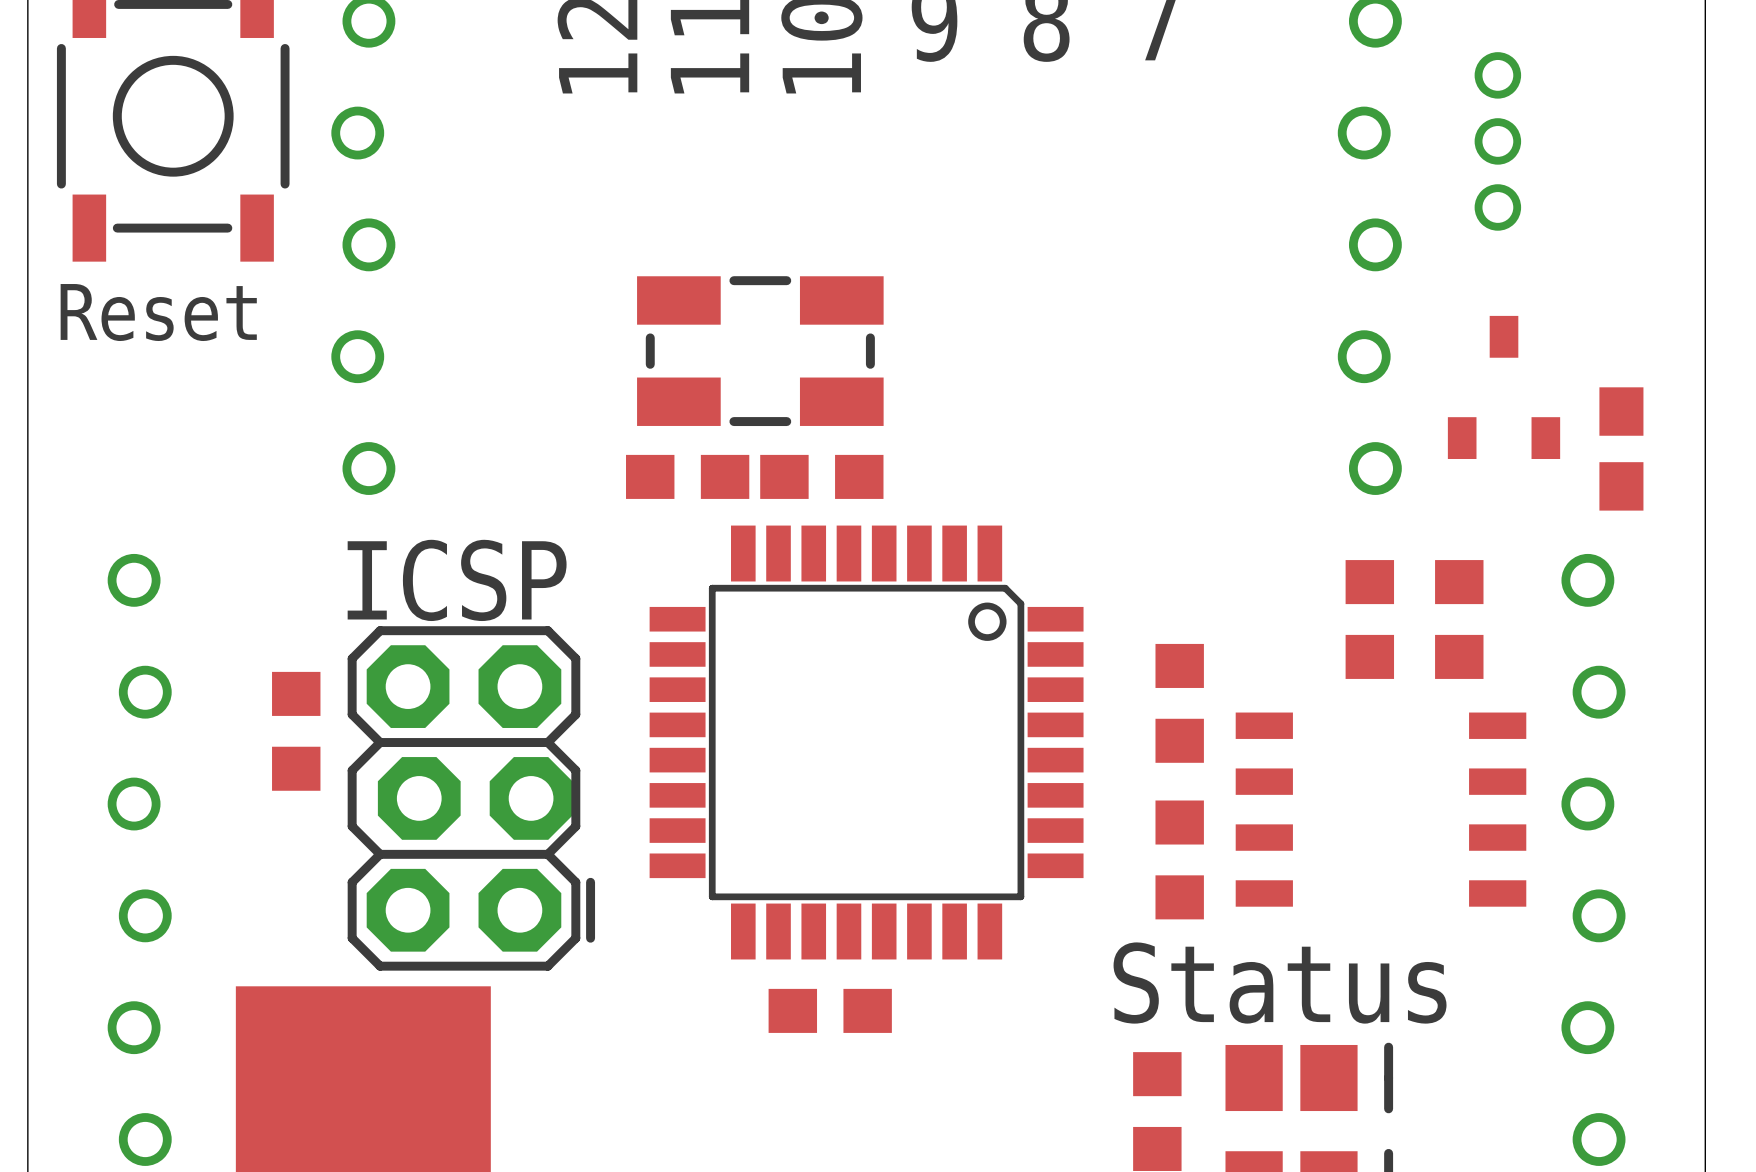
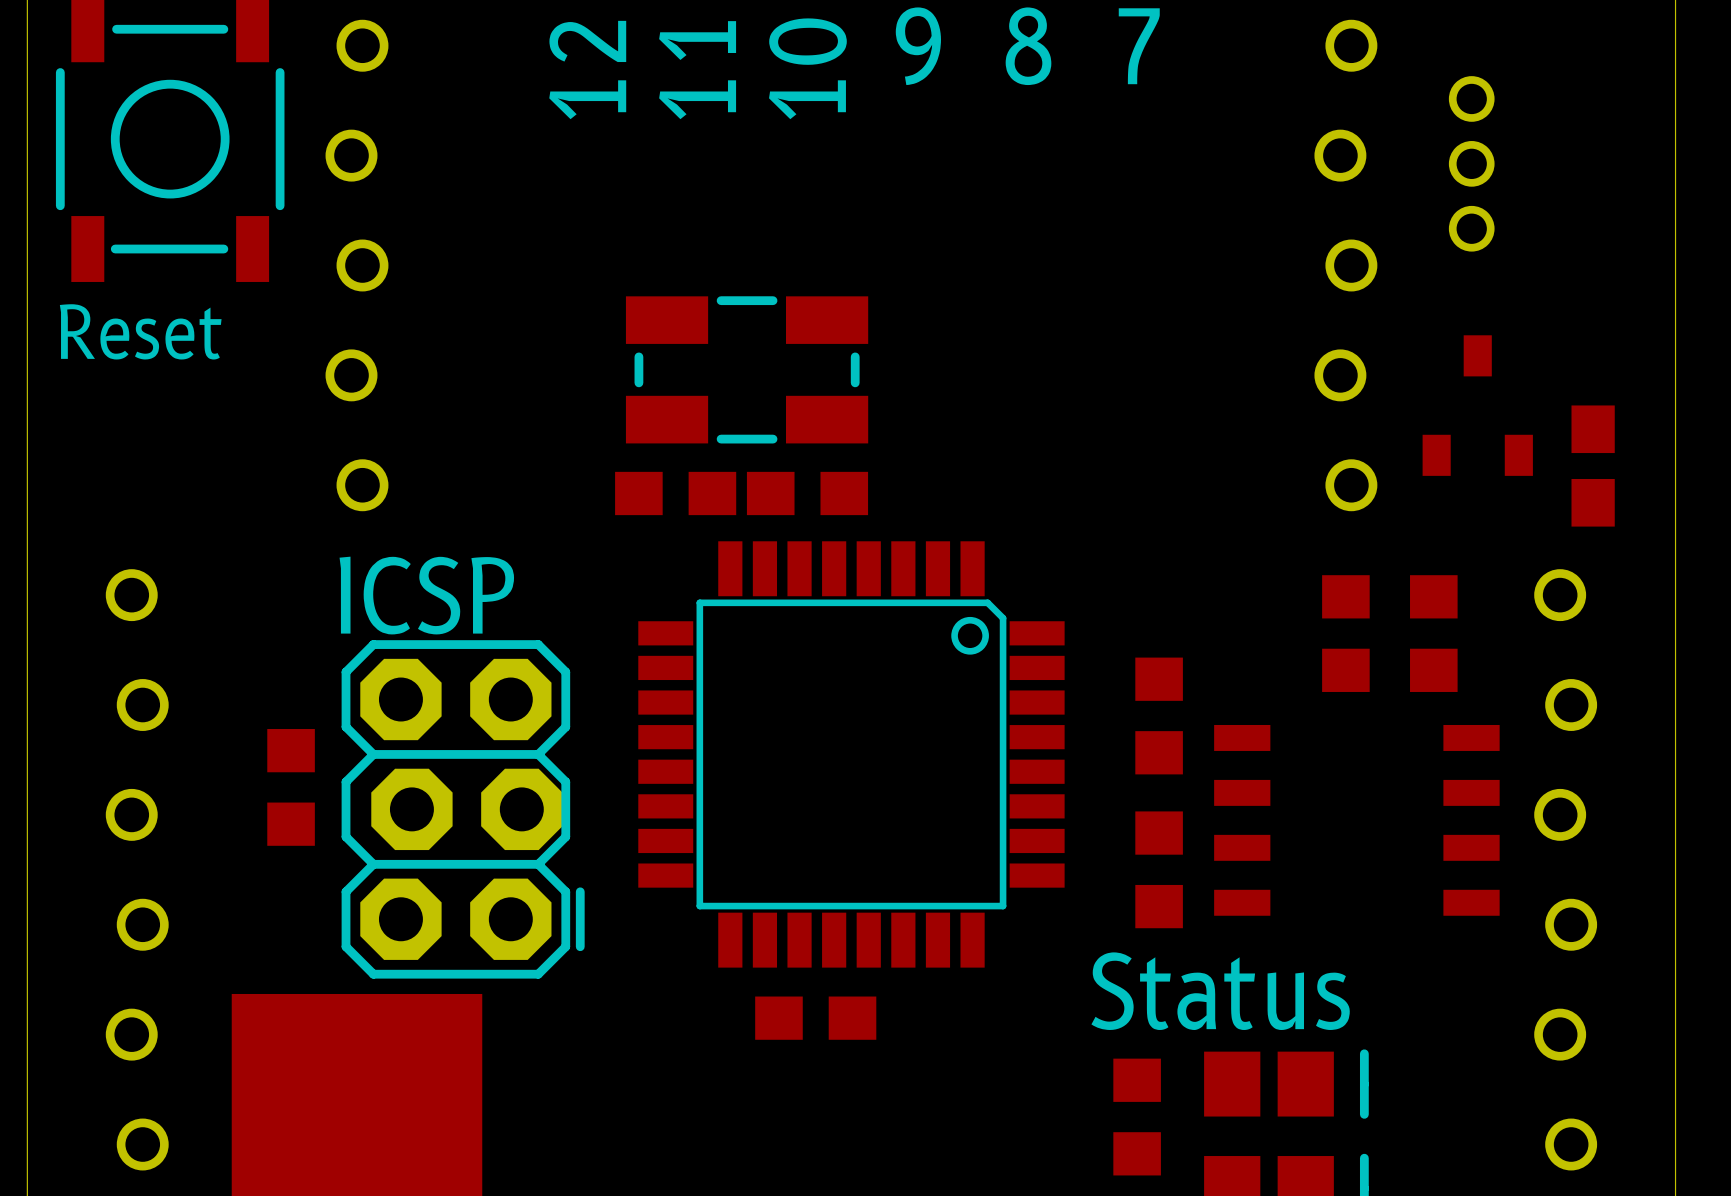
part position: (296, 731) -> (291, 787)

